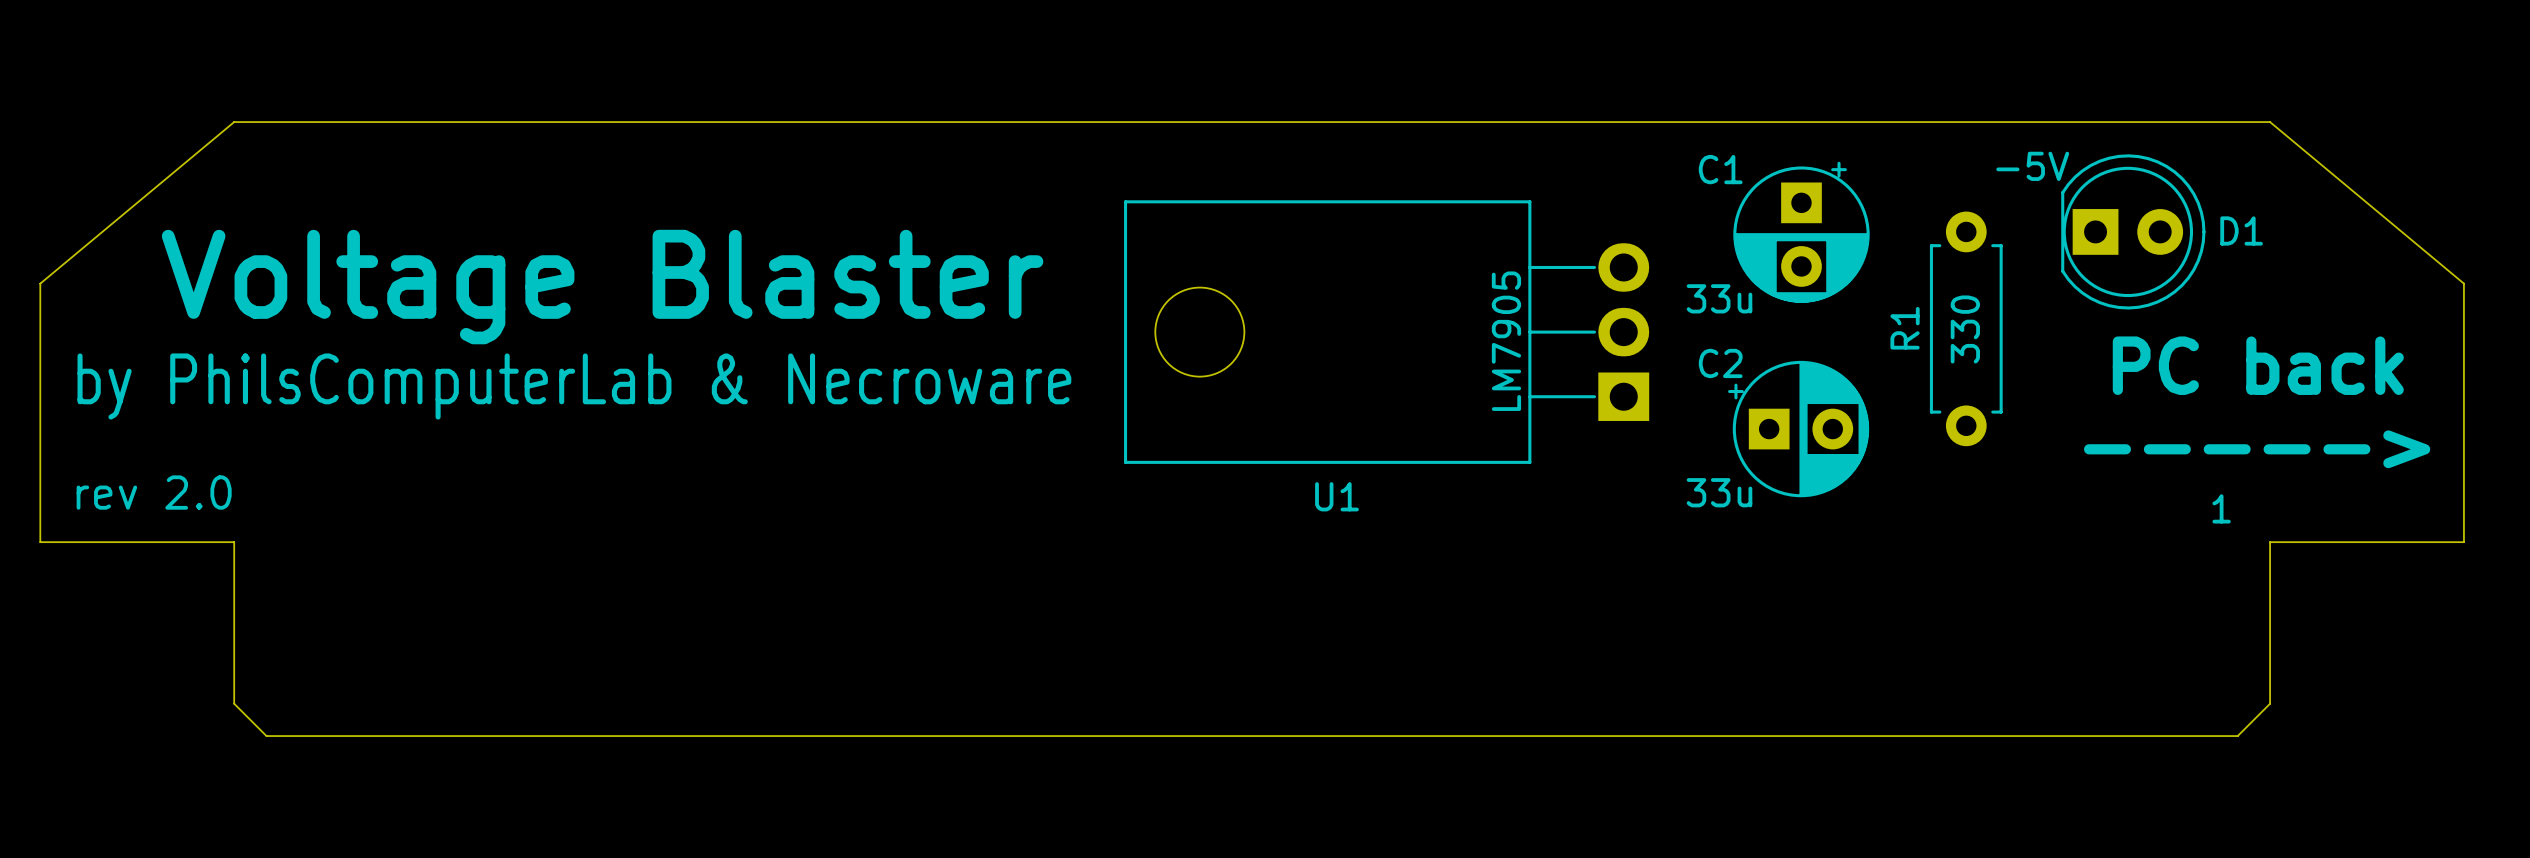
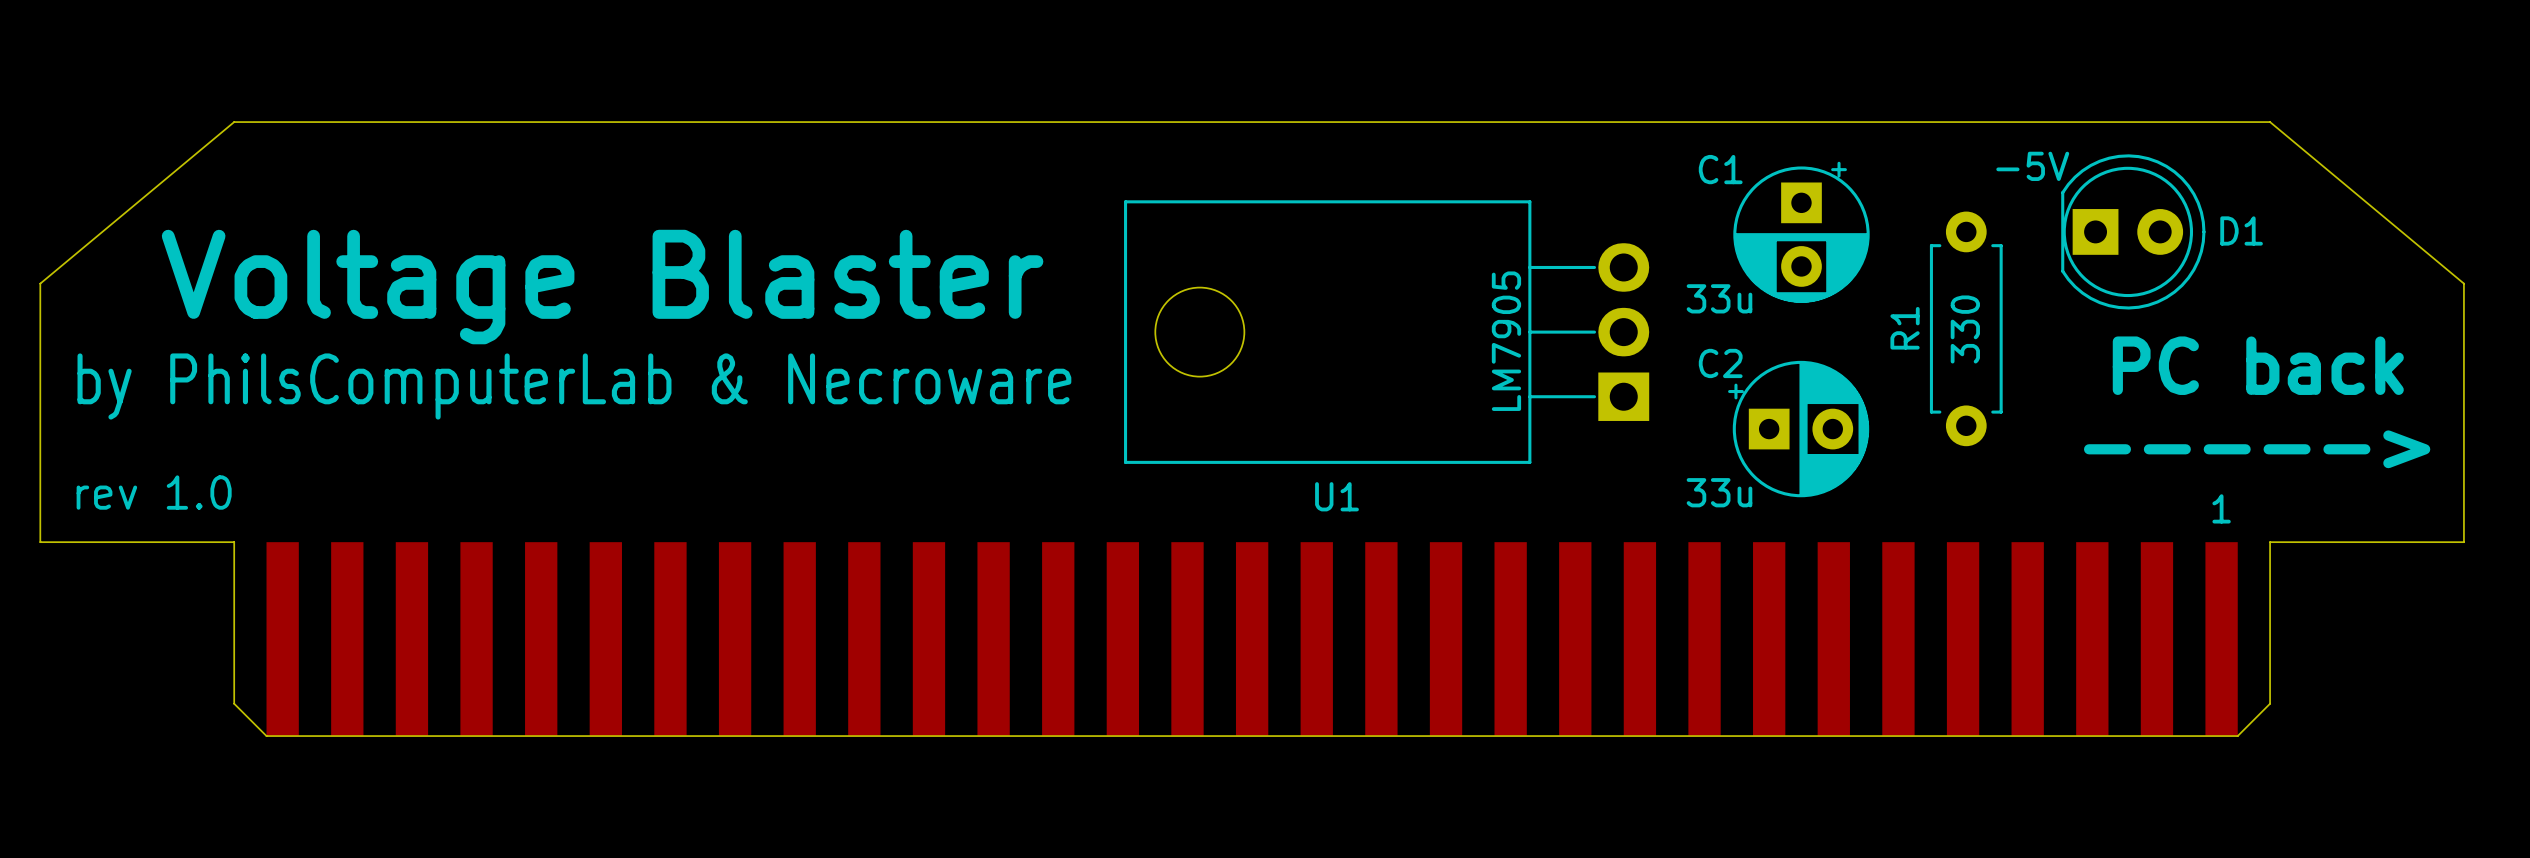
text: rev 2.0 (154, 492) -> rev 1.0 (154, 492)
part: none -> (1252, 639)

